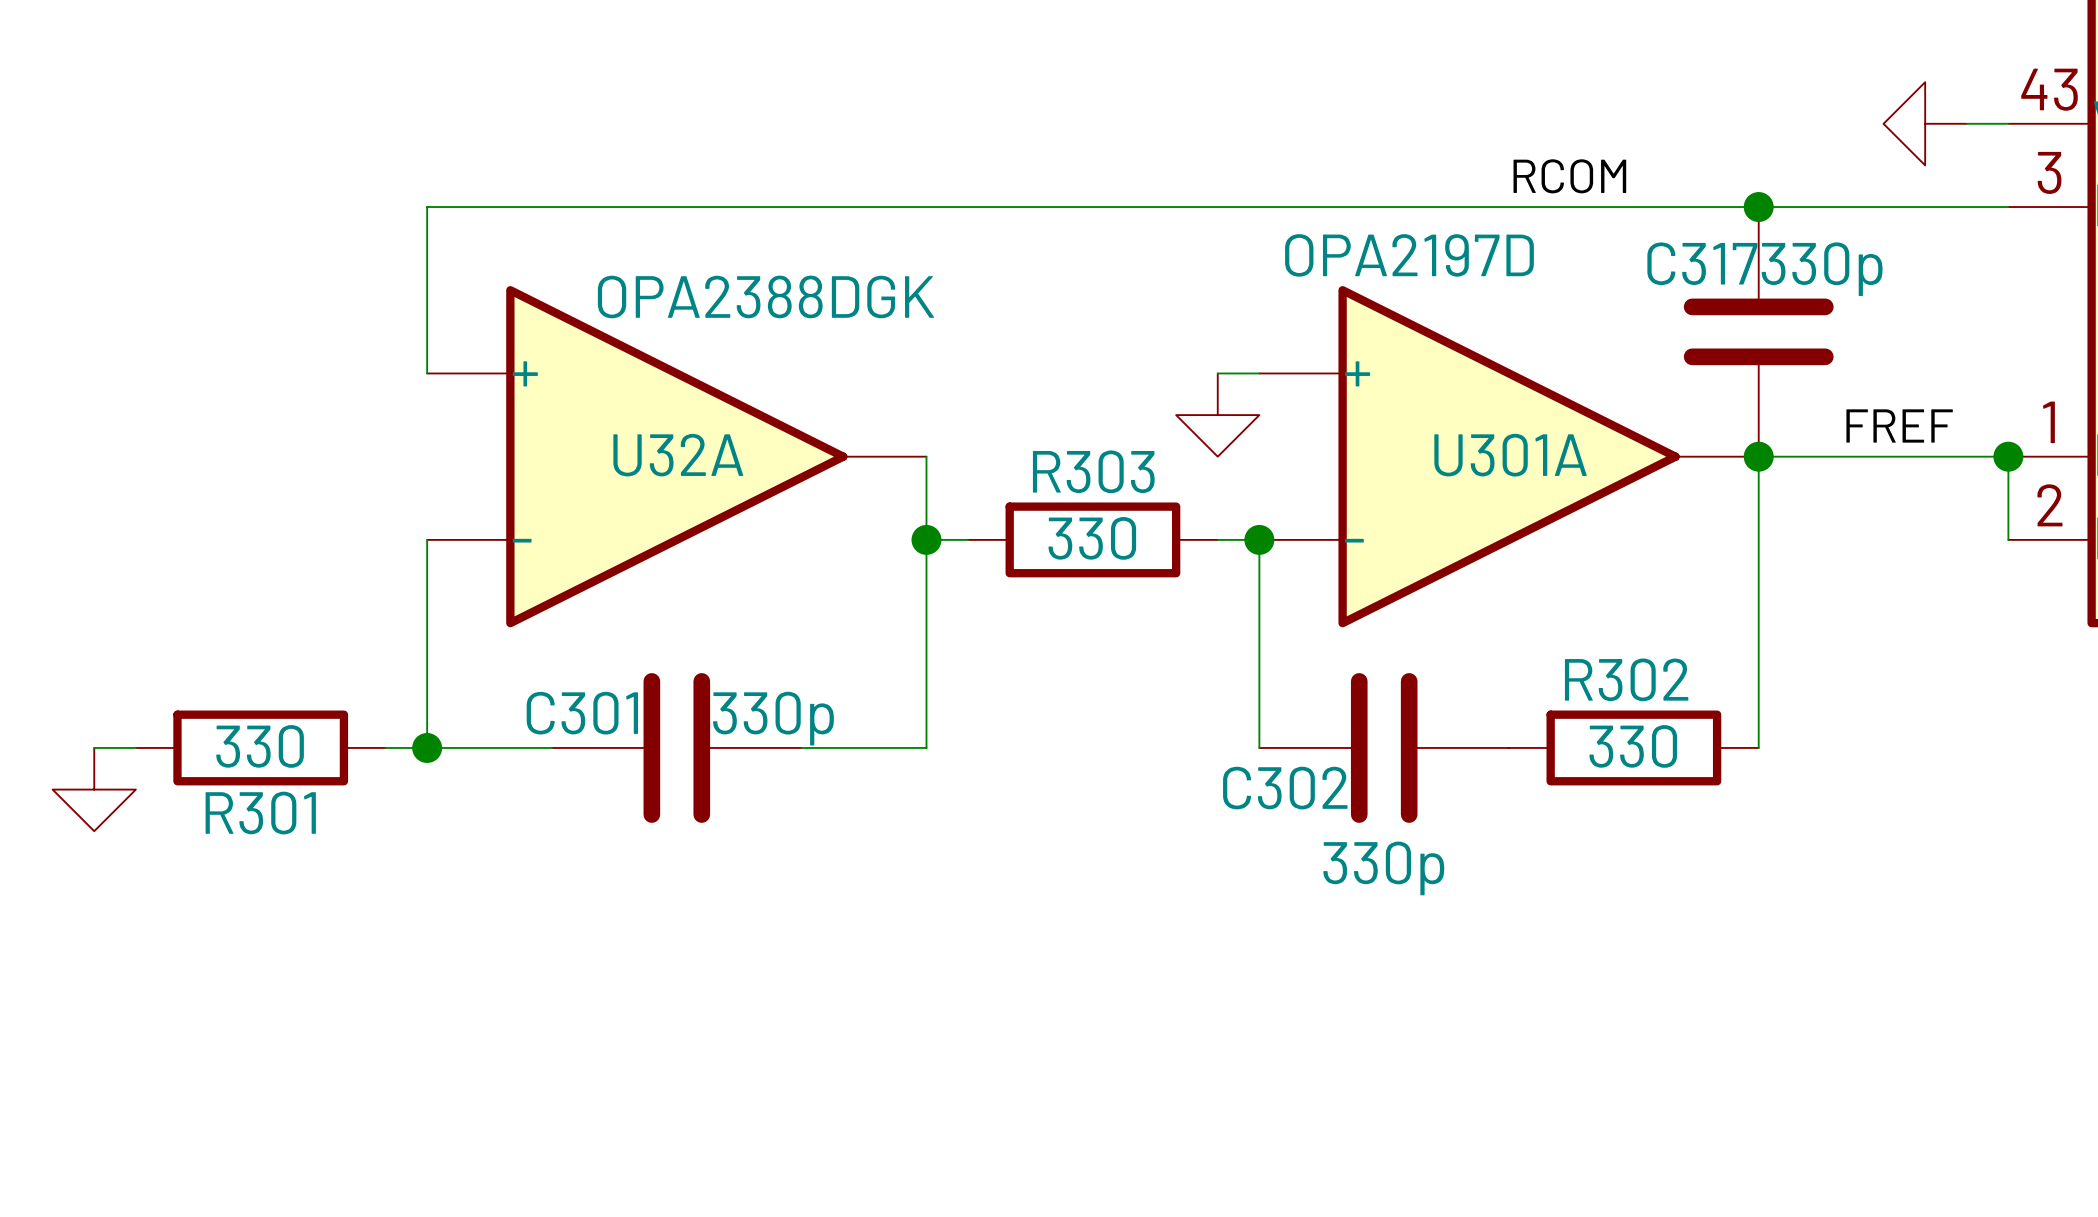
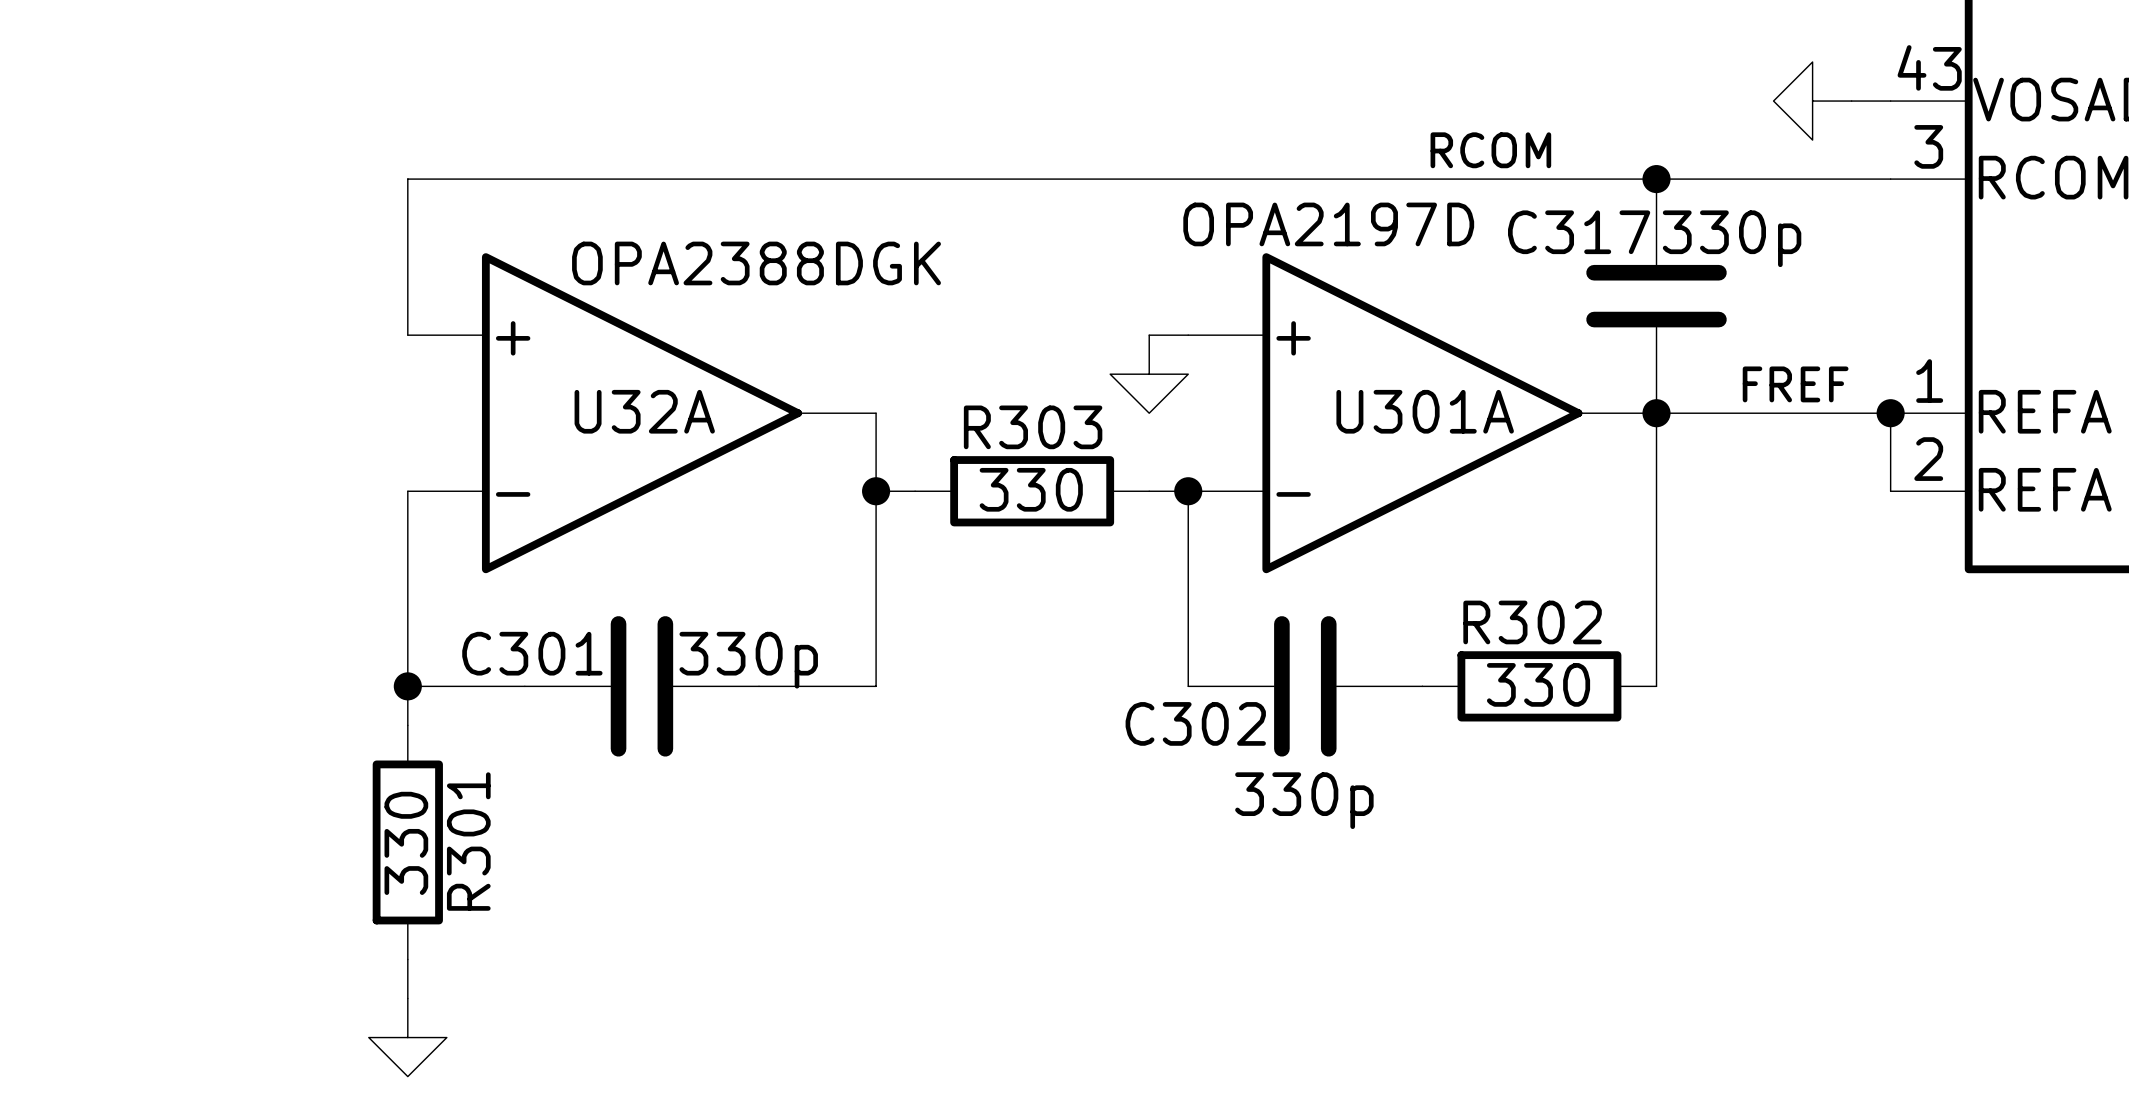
wire: (94, 747) (135, 747) -> none
R301 rotation: 0° (260, 747) -> 90° clockwise (407, 842)
R301 position: (260, 747) -> (407, 842)
wire: (385, 747) (427, 747) -> (407, 725) (407, 686)
power symbol position: (94, 789) -> (407, 1037)
R301 name position: R301 (260, 813) -> R301 (468, 841)
wire: none -> (407, 959) (407, 998)

